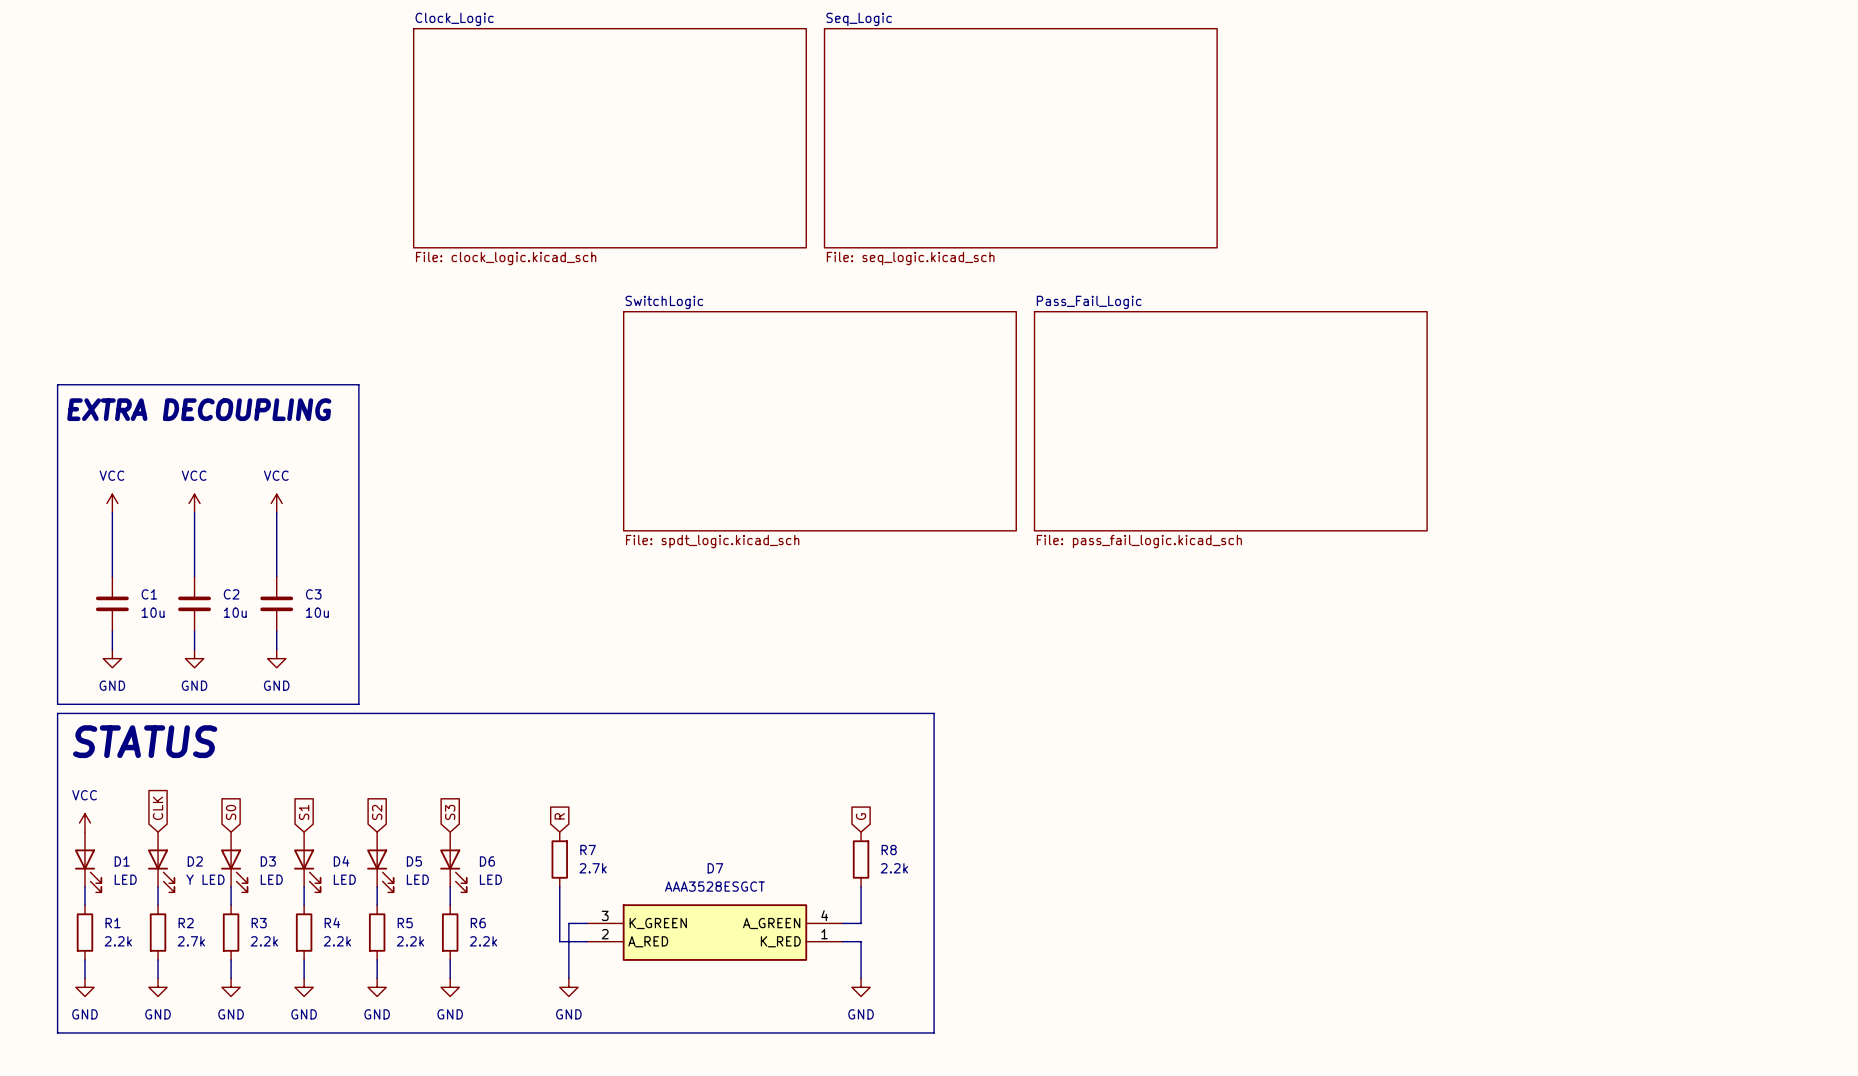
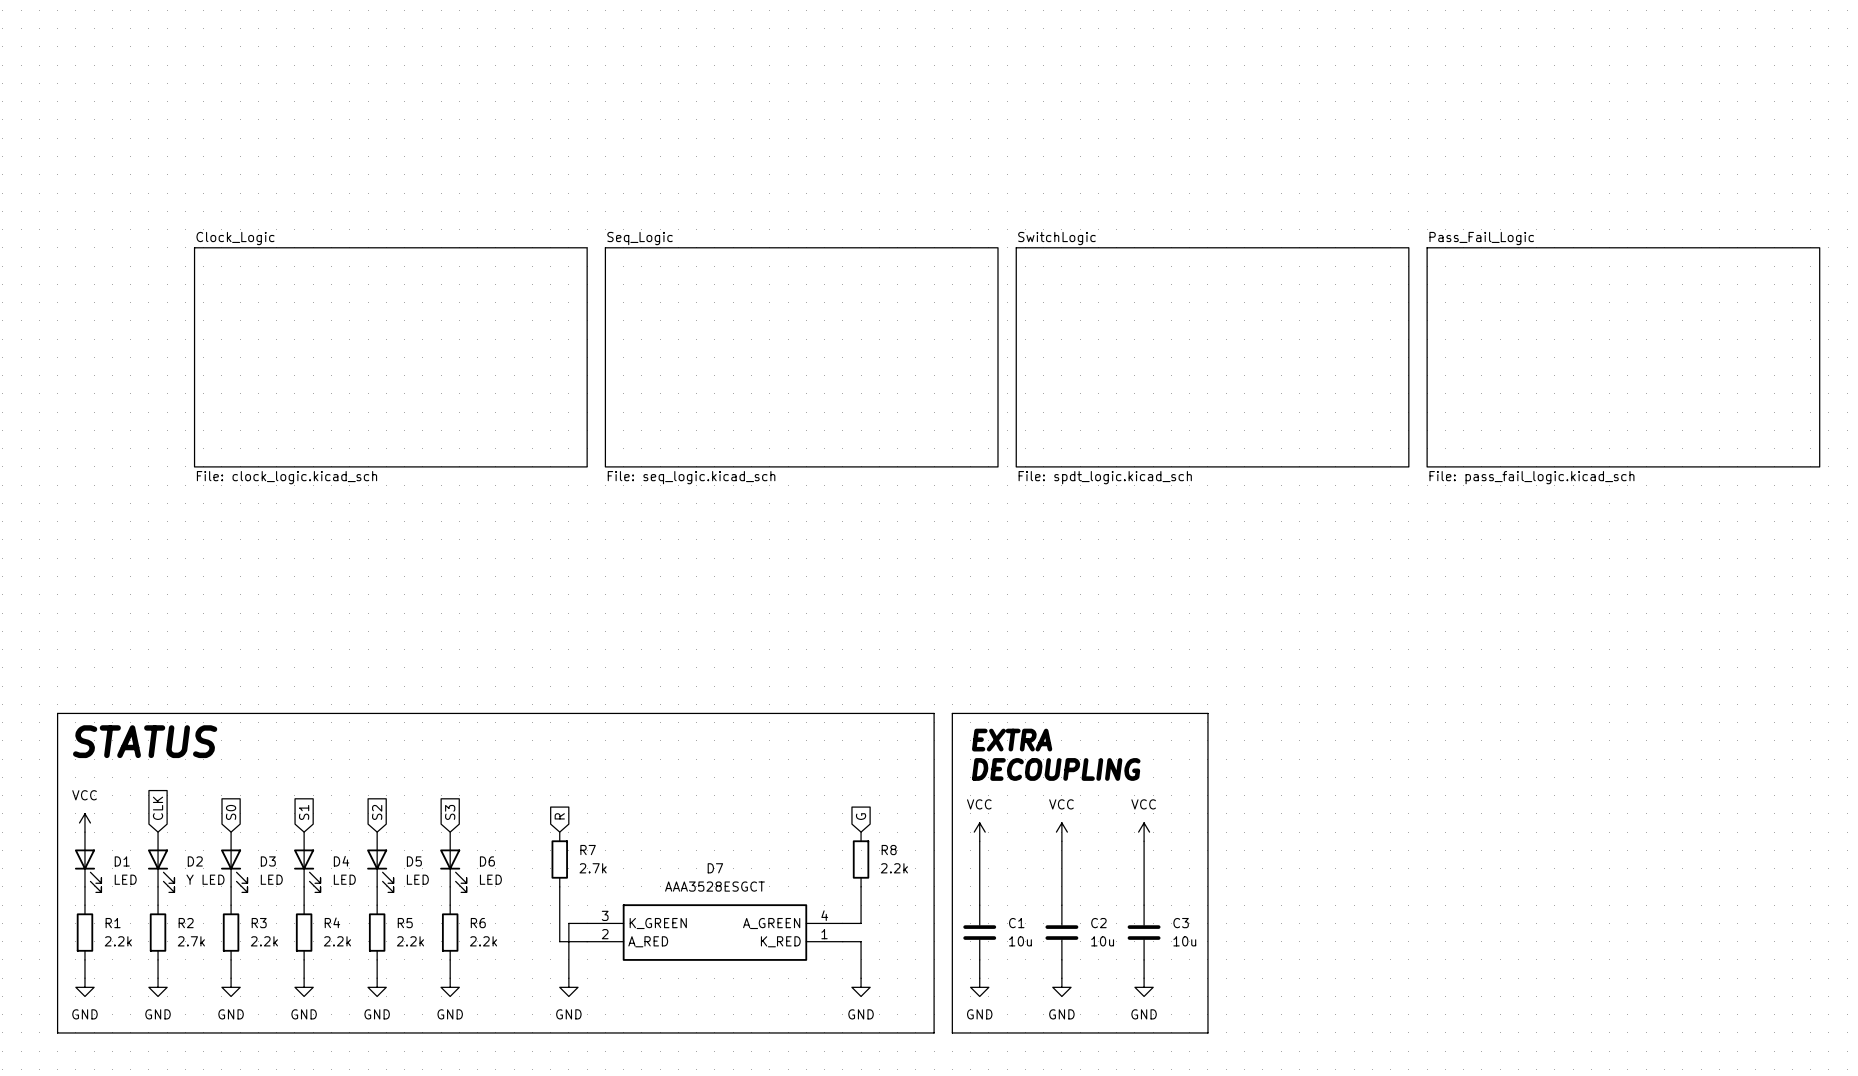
sheet Clock_Logic: File: clock_logic.kicad_sch (609, 138) -> none
sheet Seq_Logic: File: seq_logic.kicad_sch (1020, 138) -> none
sheet Clock_Logic: none -> File: clock_logic.kicad_sch (390, 357)
sheet Seq_Logic: none -> File: seq_logic.kicad_sch (801, 357)
sheet SwitchLogic: none -> File: spdt_logic.kicad_sch (1212, 357)
sheet Pass_Fail_Logic: none -> File: pass_fail_logic.kicad_sch (1623, 357)
line: (57, 384) (358, 384) (358, 704) (57, 704) (57, 384) -> none
text: EXTRA DECOUPLING (199, 409) -> none
sheet SwitchLogic: File: spdt_logic.kicad_sch (819, 421) -> none
sheet Pass_Fail_Logic: File: pass_fail_logic.kicad_sch (1230, 421) -> none
power symbol: VCC (112, 503) -> none
power symbol: VCC (194, 503) -> none
power symbol: VCC (276, 503) -> none
wire: (112, 512) (112, 576) -> none
wire: (194, 512) (194, 576) -> none
wire: (276, 512) (276, 576) -> none
C1 position: (112, 603) -> (979, 932)
C2 position: (194, 603) -> (1061, 932)
C3 position: (276, 603) -> (1144, 932)
wire: (112, 631) (112, 649) -> none
wire: (194, 631) (194, 649) -> none
wire: (276, 631) (276, 649) -> none
power symbol: GND (112, 658) -> none
power symbol: GND (194, 658) -> none
power symbol: GND (276, 658) -> none
line: none -> (952, 713) (1207, 713) (1207, 1032) (952, 1032) (952, 713)
text: none -> EXTRA (1012, 740)
text: none -> DECOUPLING (1056, 769)
power symbol: none -> VCC (979, 832)
power symbol: none -> VCC (1061, 832)
power symbol: none -> VCC (1144, 832)
wire: none -> (979, 841) (979, 905)
wire: none -> (1061, 841) (1061, 905)
wire: none -> (1144, 841) (1144, 905)
wire: none -> (979, 959) (979, 978)
wire: none -> (1061, 959) (1061, 978)
wire: none -> (1144, 959) (1144, 978)
power symbol: none -> GND (979, 987)
power symbol: none -> GND (1061, 987)
power symbol: none -> GND (1144, 987)

